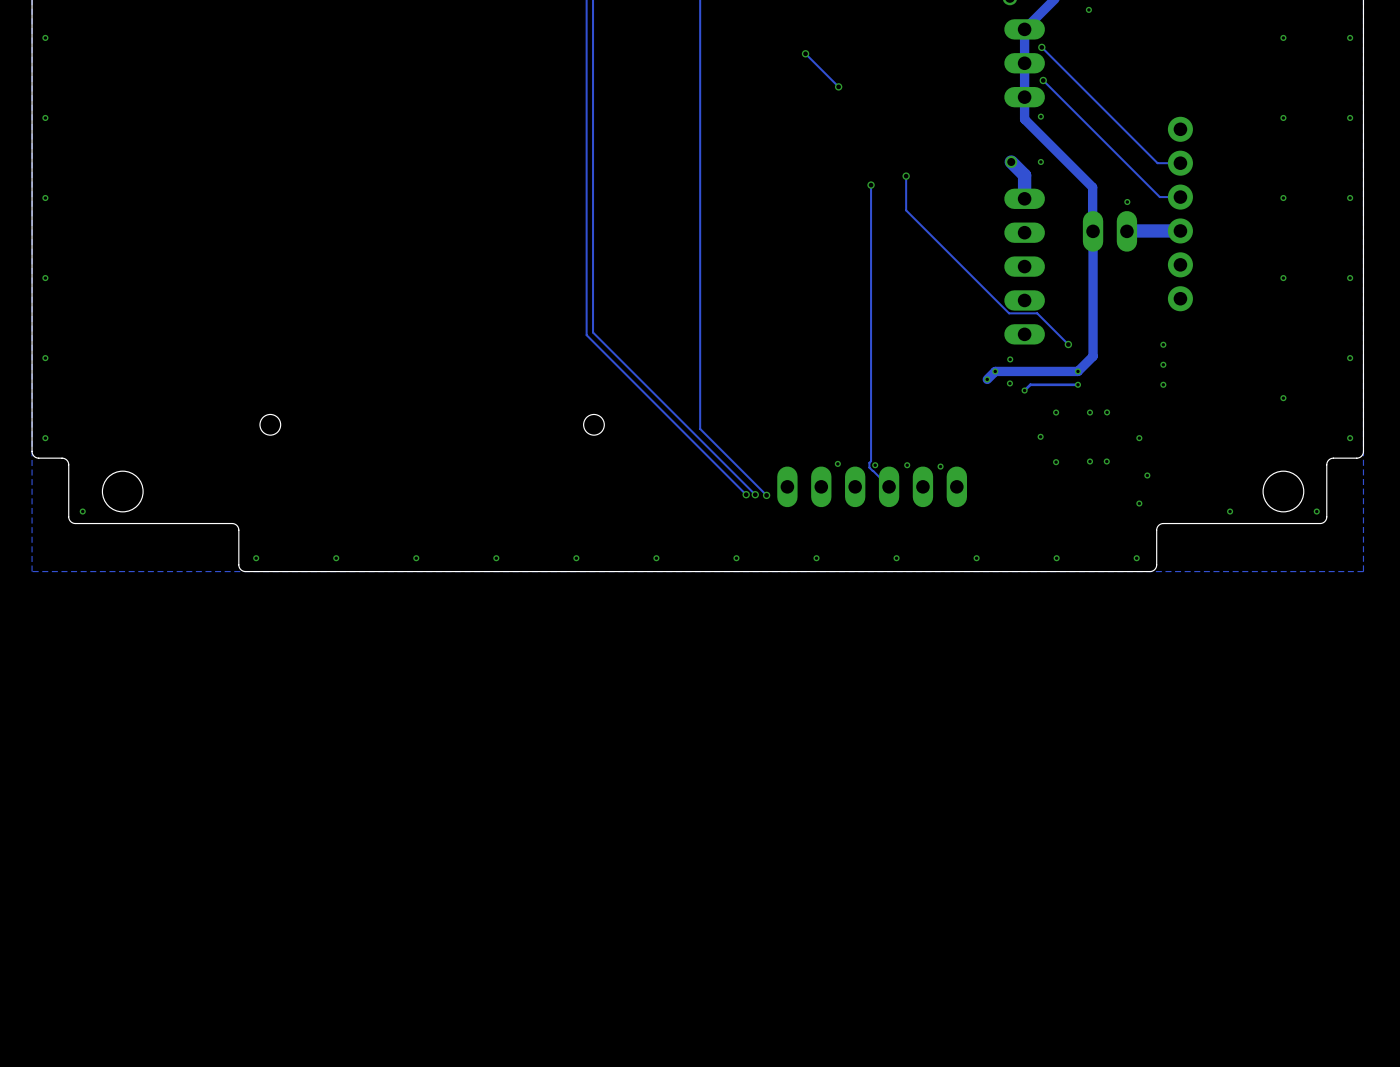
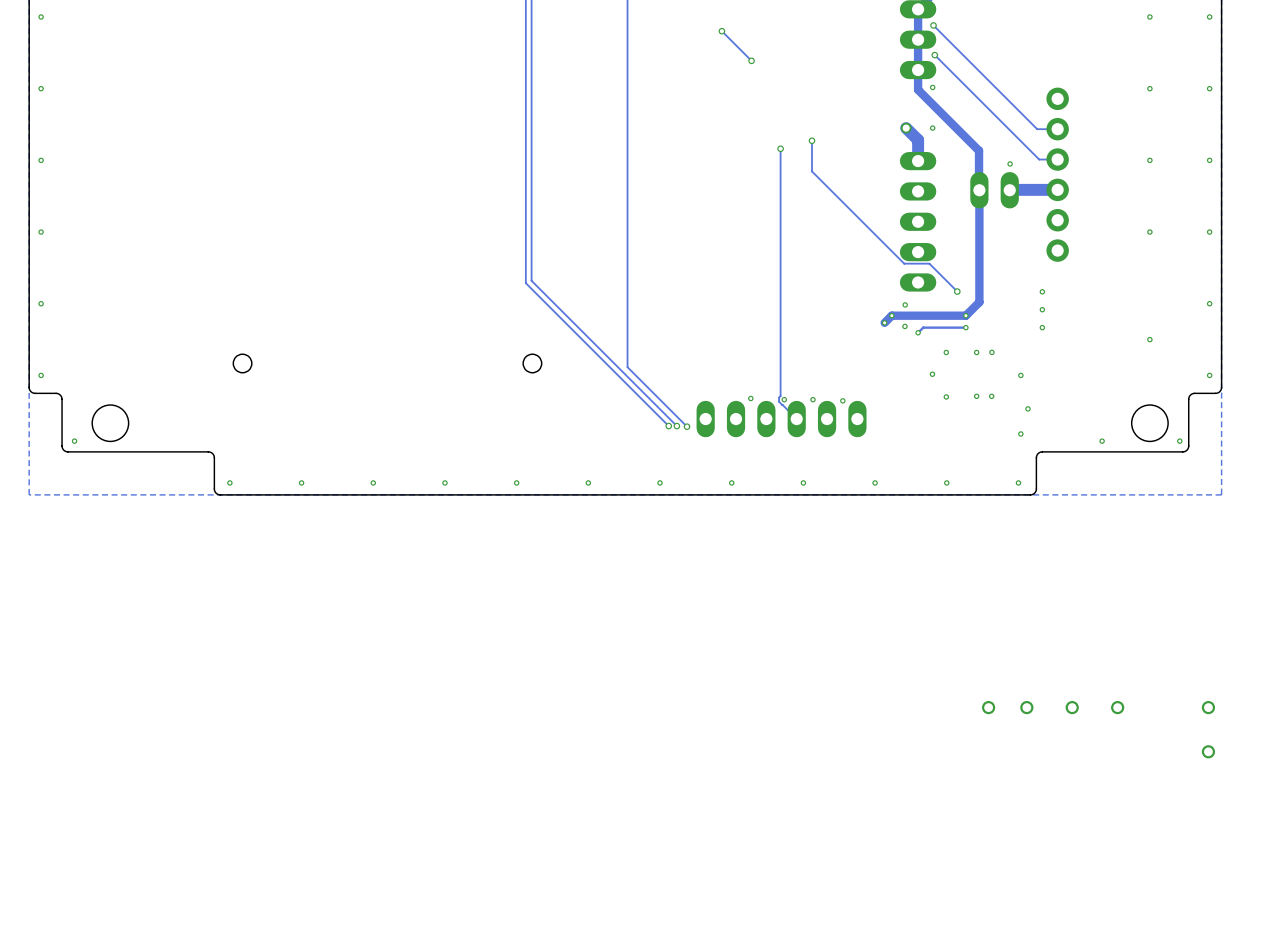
part: none -> (988, 707)
part: none -> (1026, 707)
part: none -> (1072, 707)
part: none -> (1117, 707)
part: none -> (1208, 707)
part: none -> (1208, 751)

